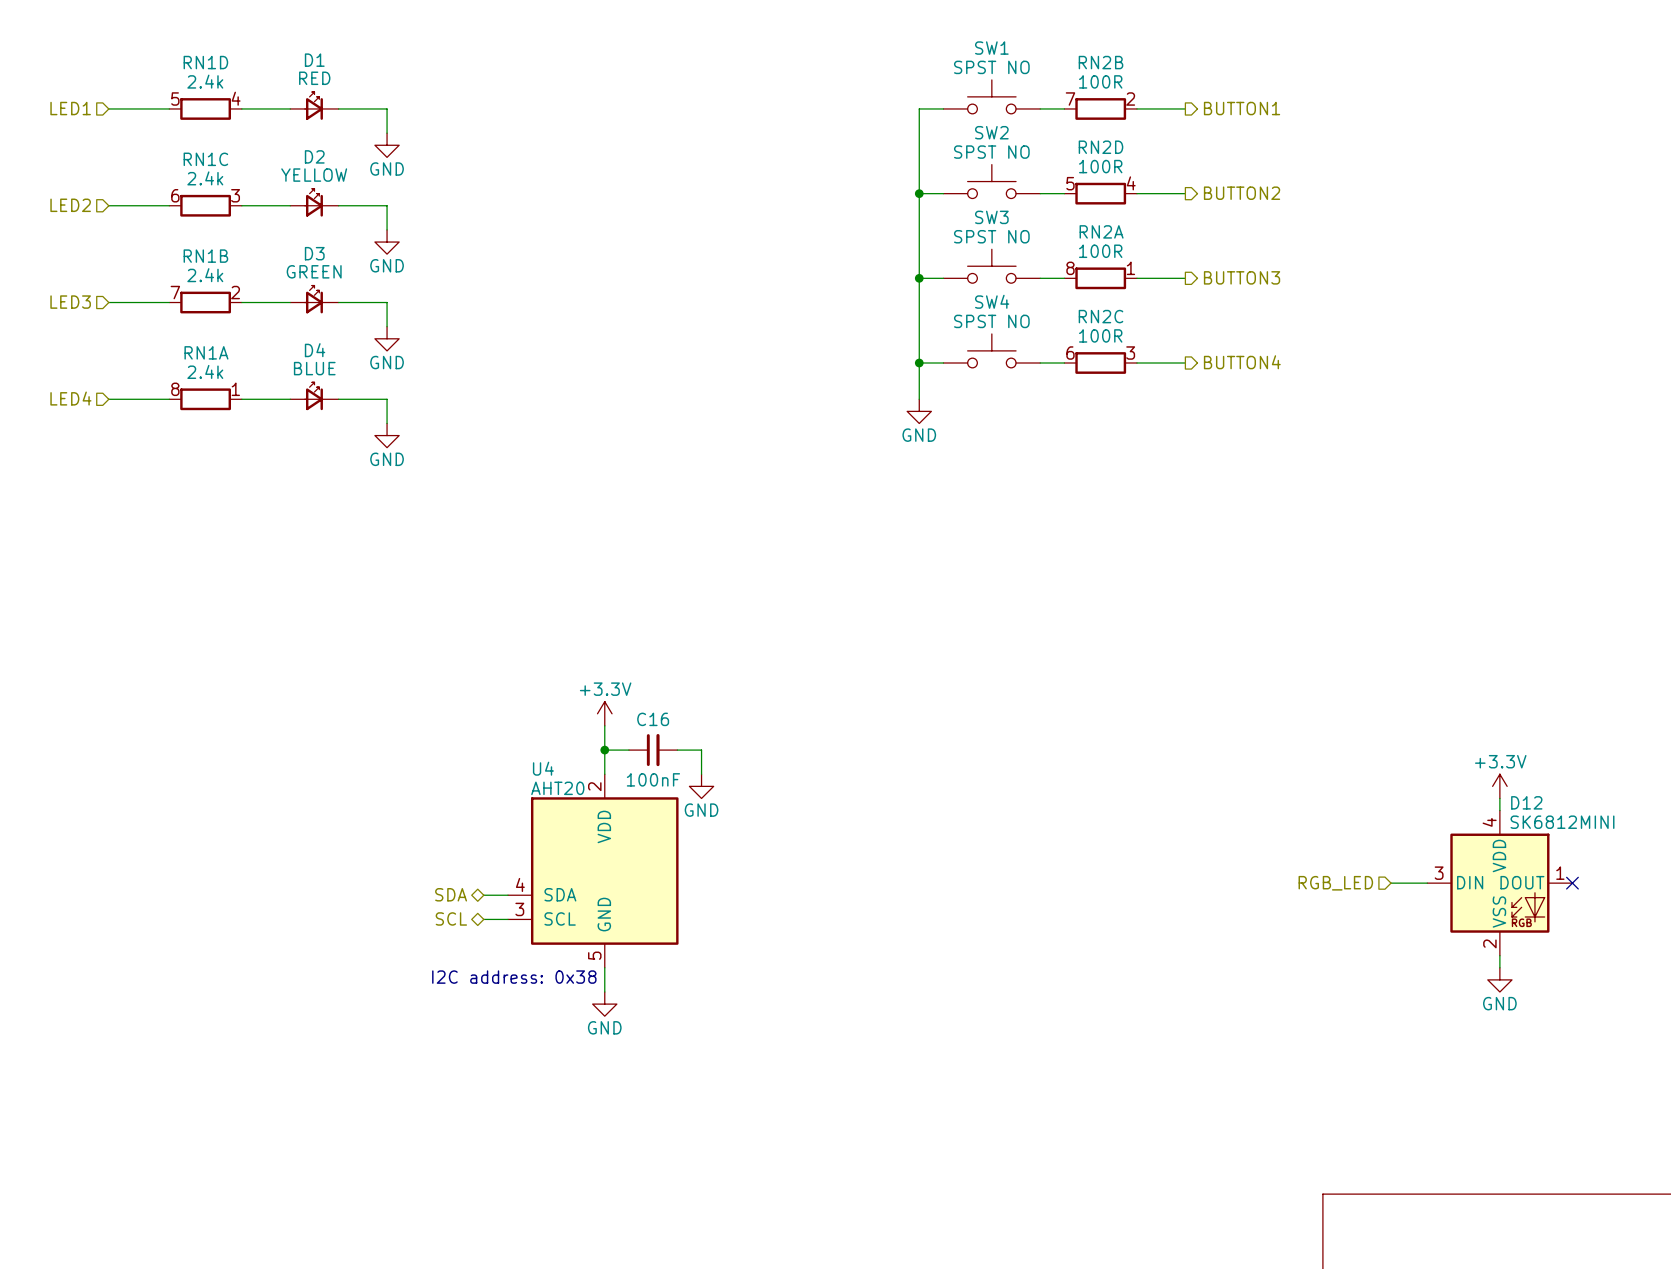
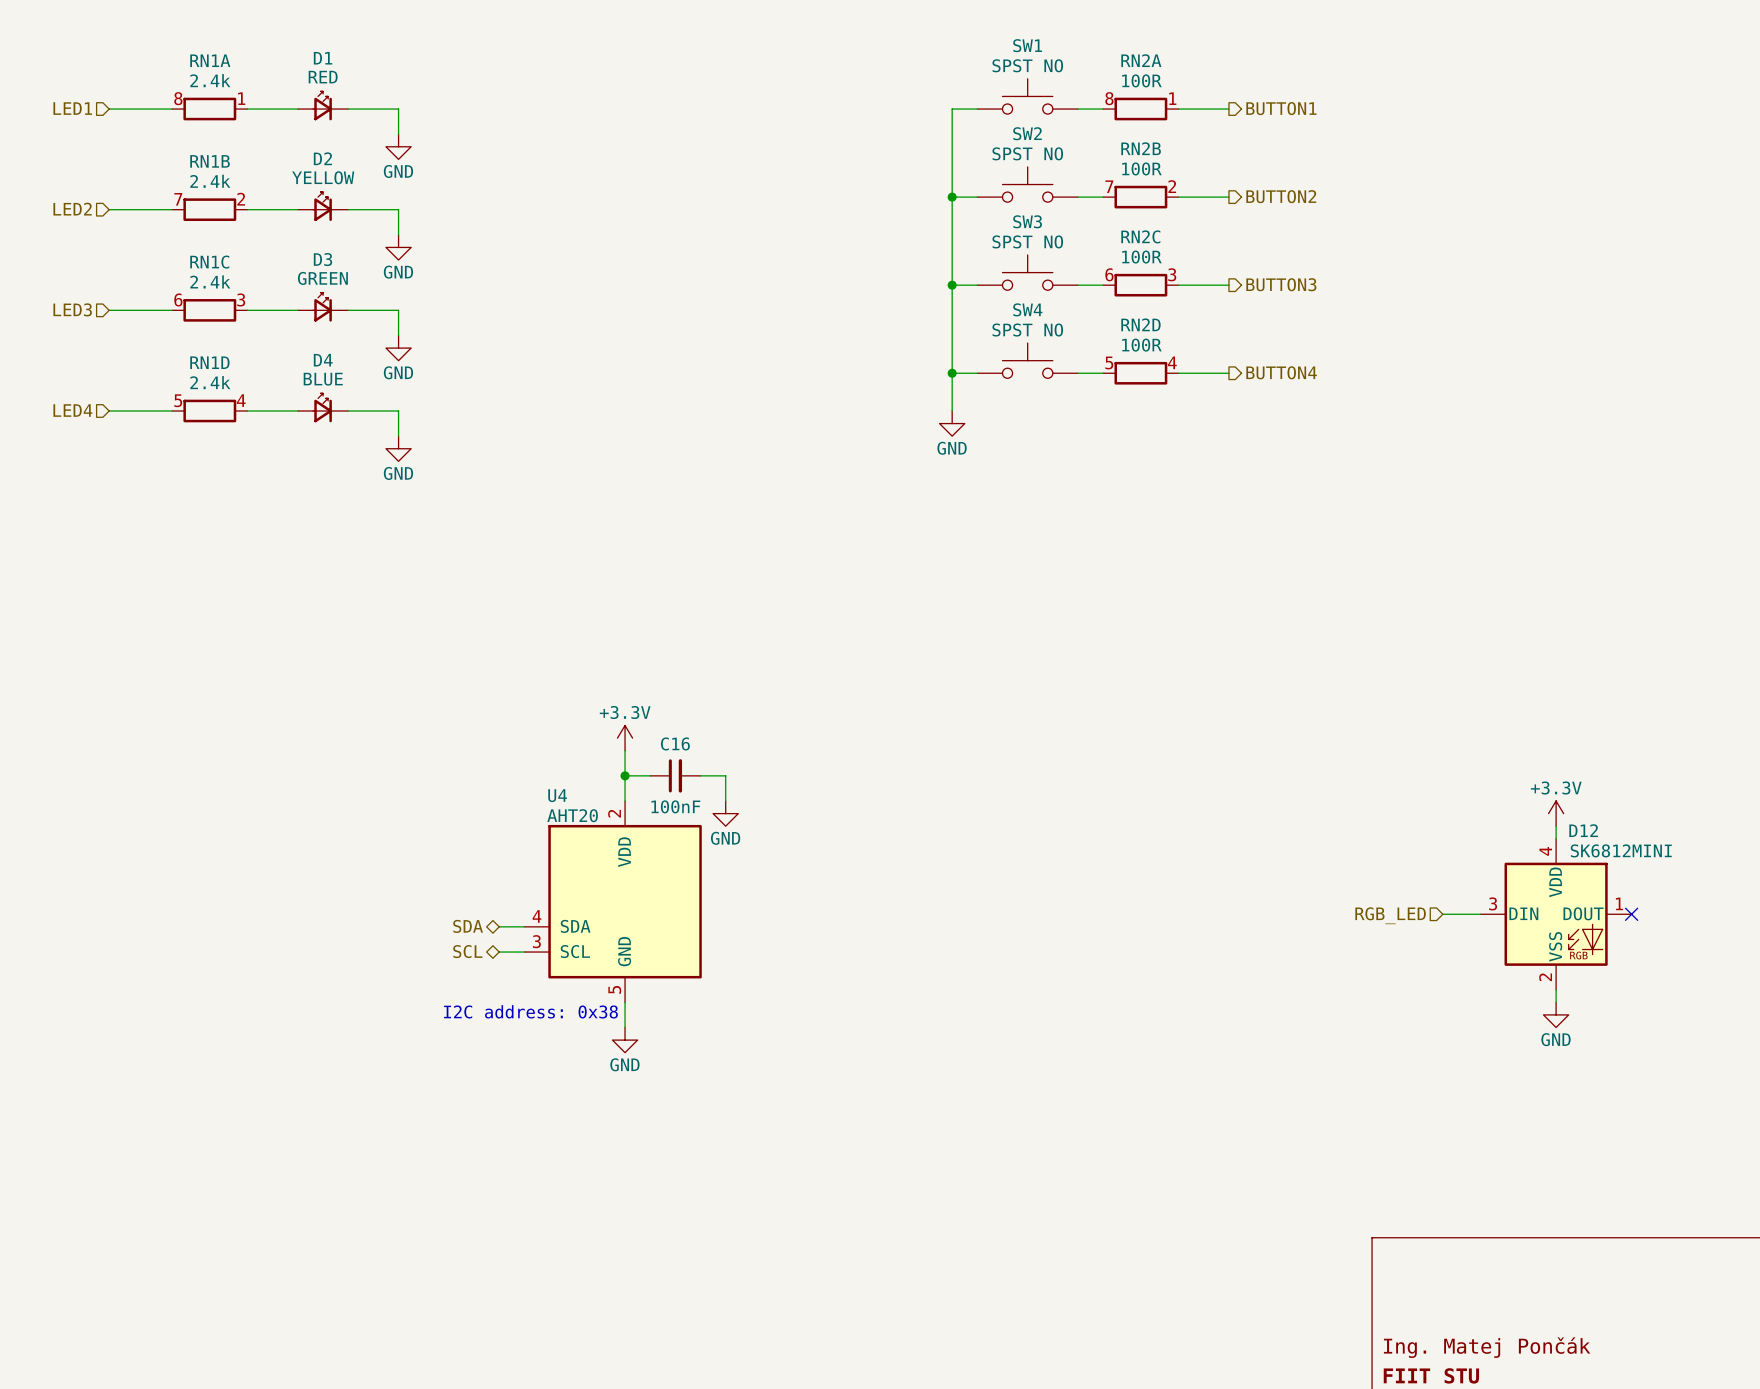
RN1D position: (205, 108) -> (209, 410)
RN2B position: (1100, 108) -> (1140, 197)
RN2D position: (1100, 193) -> (1140, 373)
RN1C position: (205, 205) -> (209, 310)
RN2A position: (1100, 278) -> (1140, 109)
RN1B position: (205, 302) -> (209, 209)
RN2C position: (1100, 363) -> (1140, 285)
RN1A position: (205, 399) -> (209, 109)

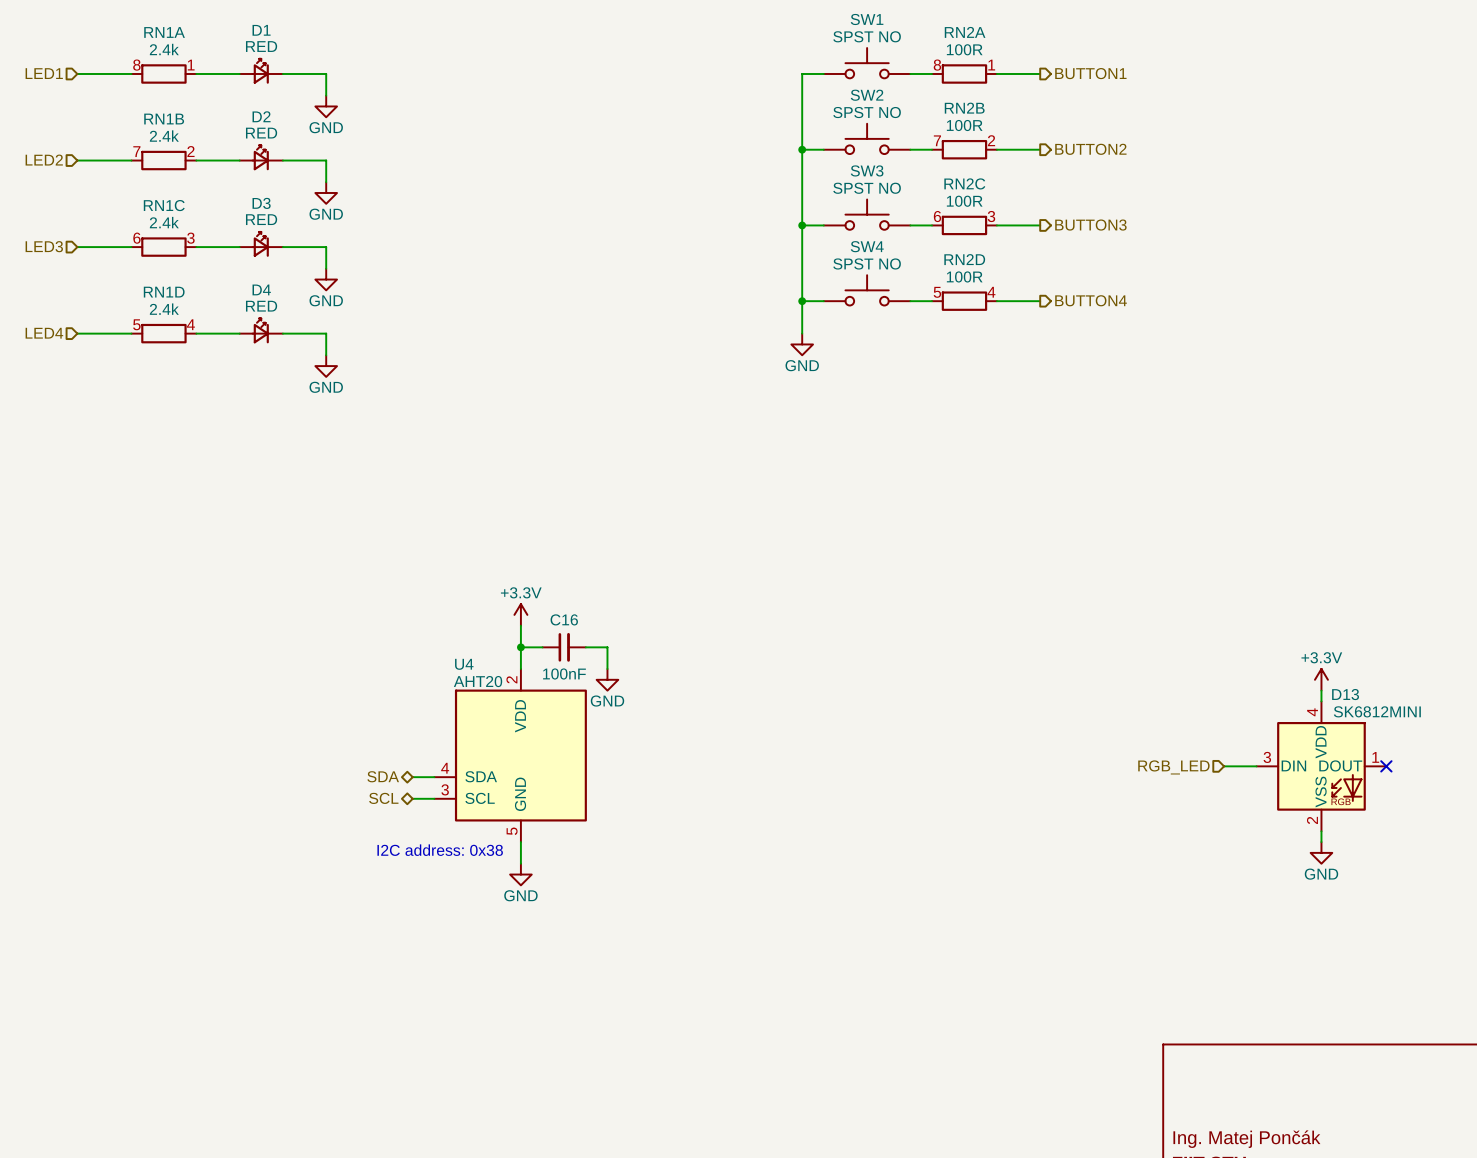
D2 value: YELLOW (323, 177) -> RED (261, 133)
D3 value: GREEN (322, 278) -> RED (261, 219)
D4 value: BLUE (323, 379) -> RED (261, 306)
D12 name: D12 (1583, 830) -> D13 (1345, 694)

